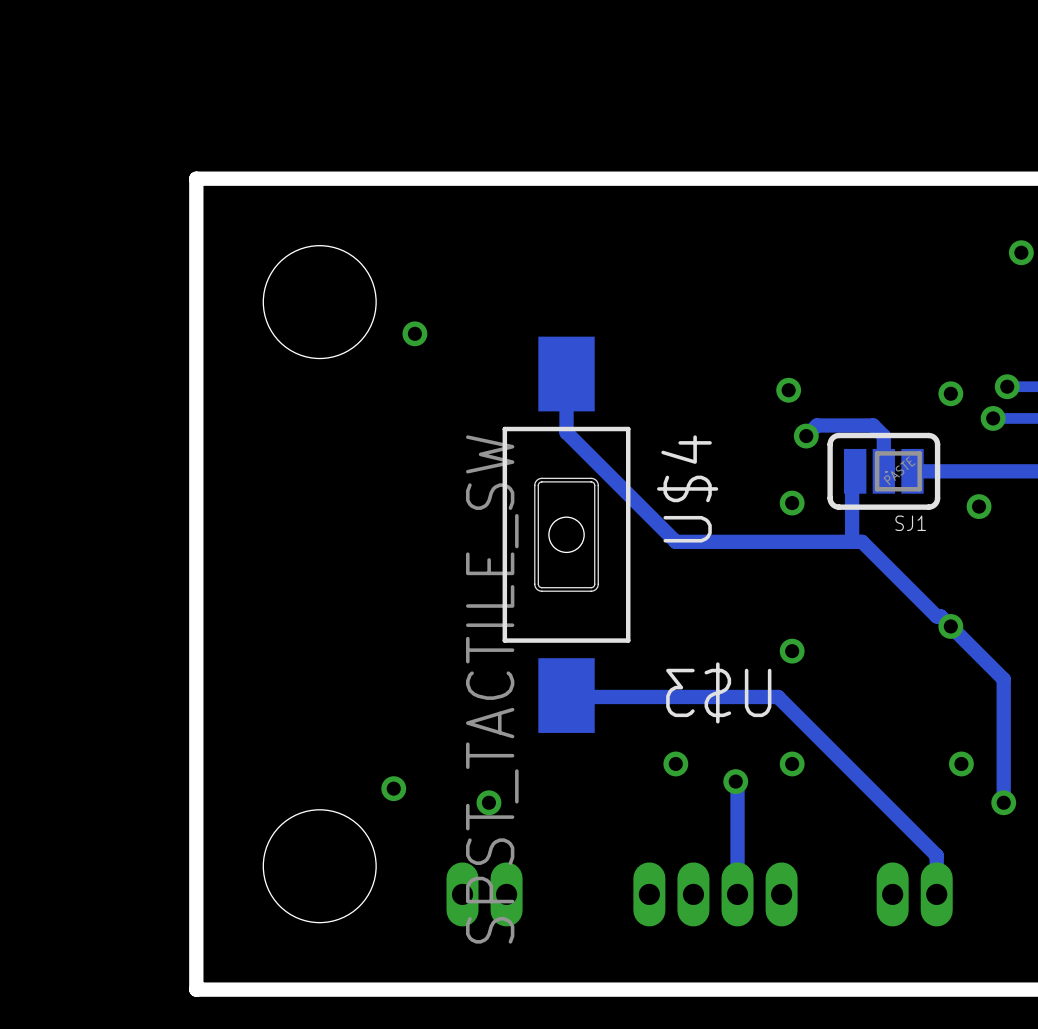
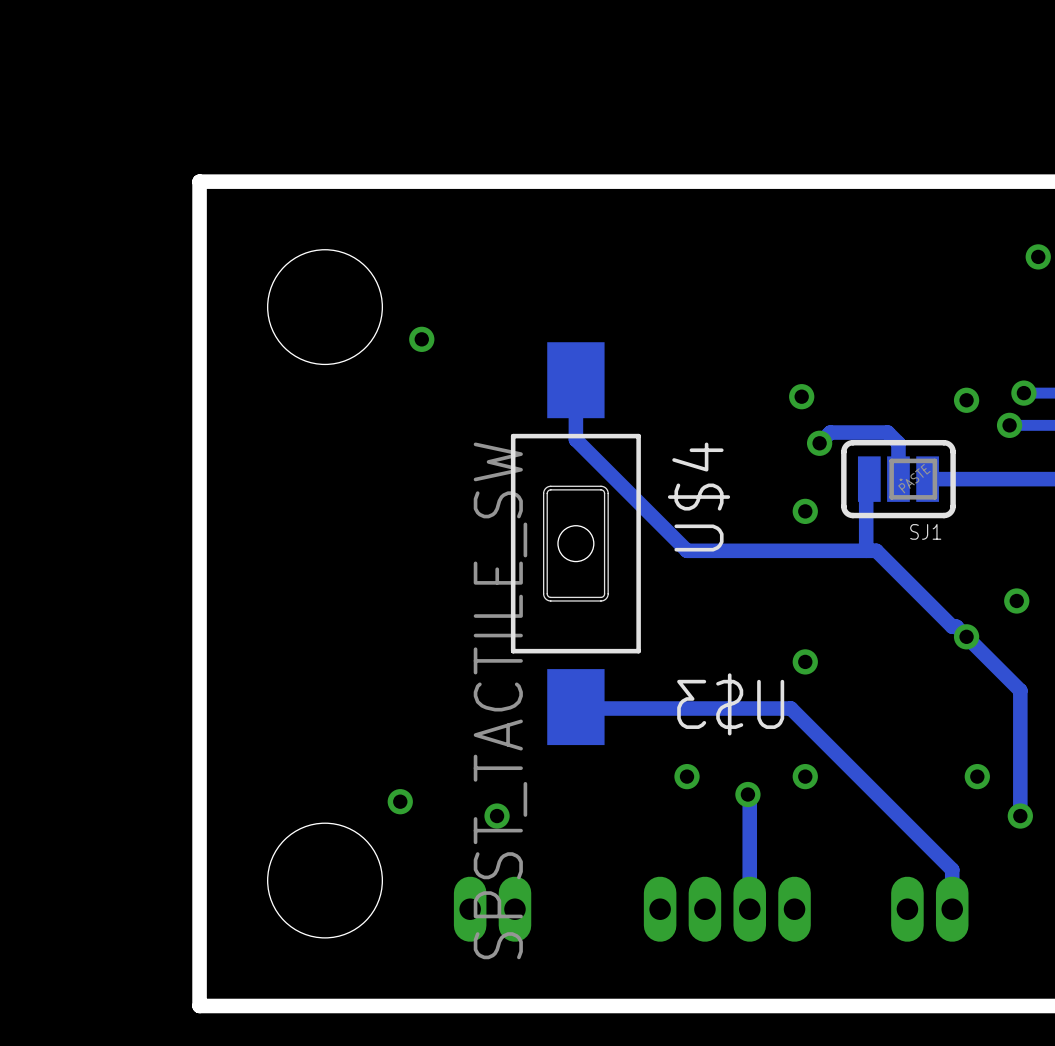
via position: (979, 506) -> (1016, 600)

